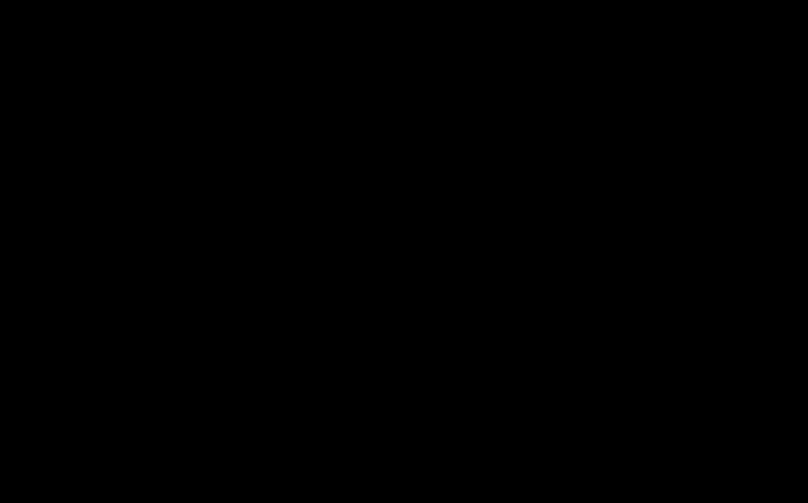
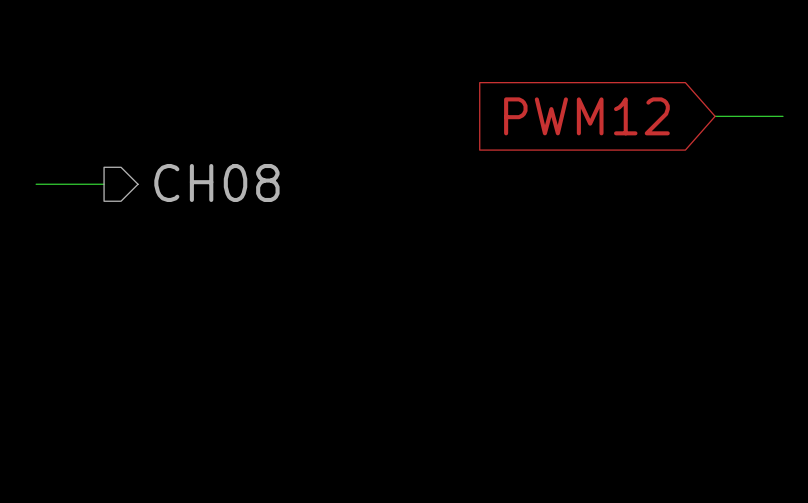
global label: none -> PWM12 (586, 116)
wire: none -> (715, 116) (783, 116)
hierarchical label: none -> CH08 (216, 182)
wire: none -> (36, 184) (104, 184)

